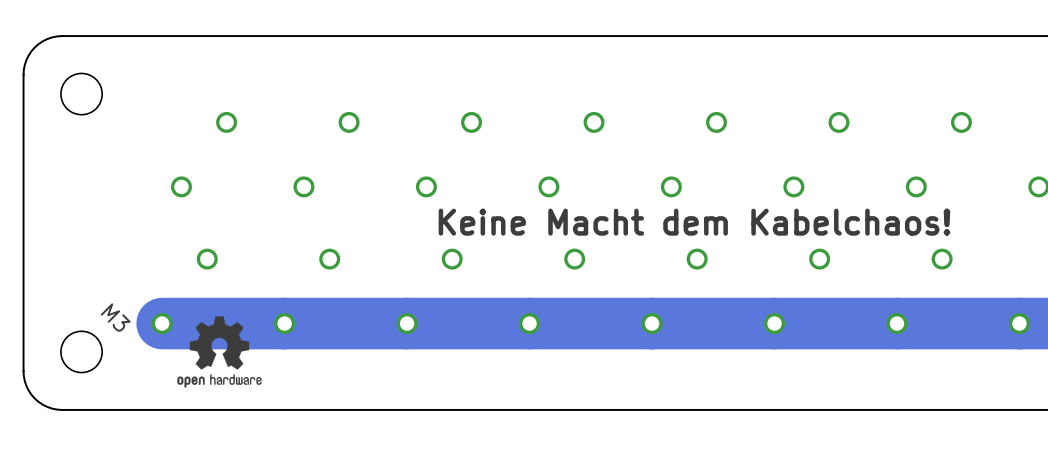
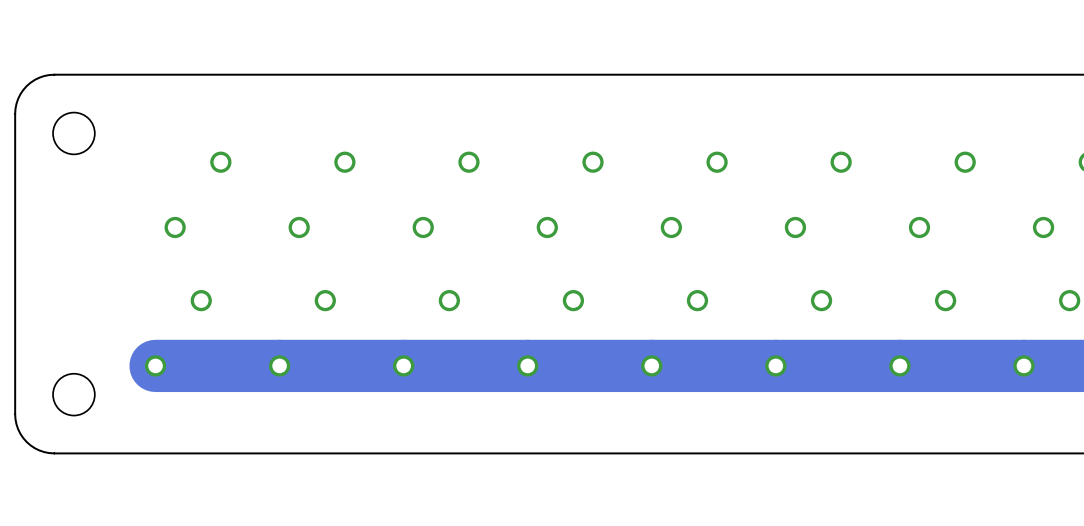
text: Keine Macht dem Kabelchaos! (694, 222) -> none
drawing: [177, 316, 262, 388] -> none
text: M3 (115, 317) -> none

